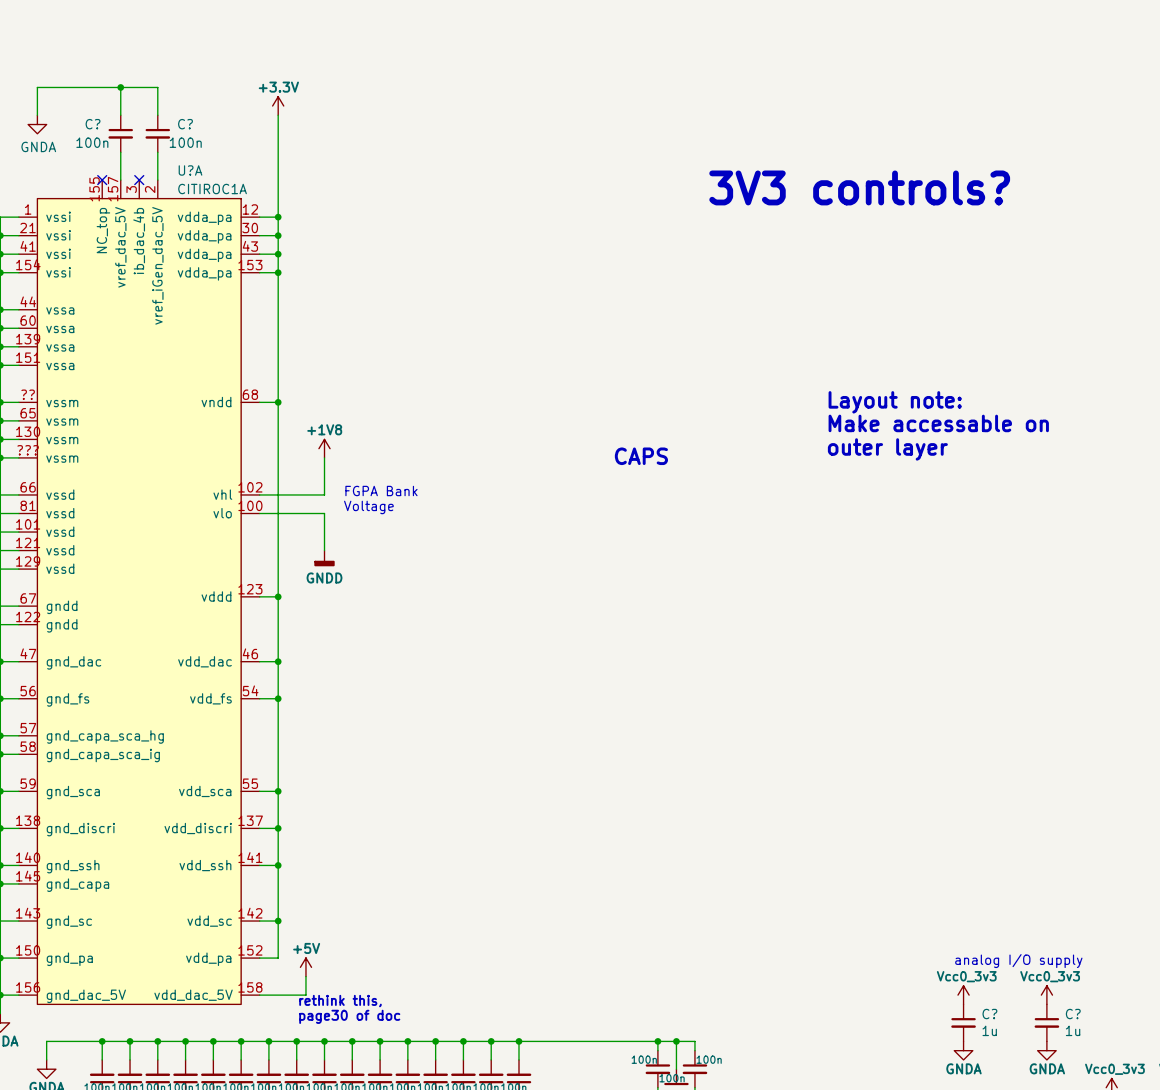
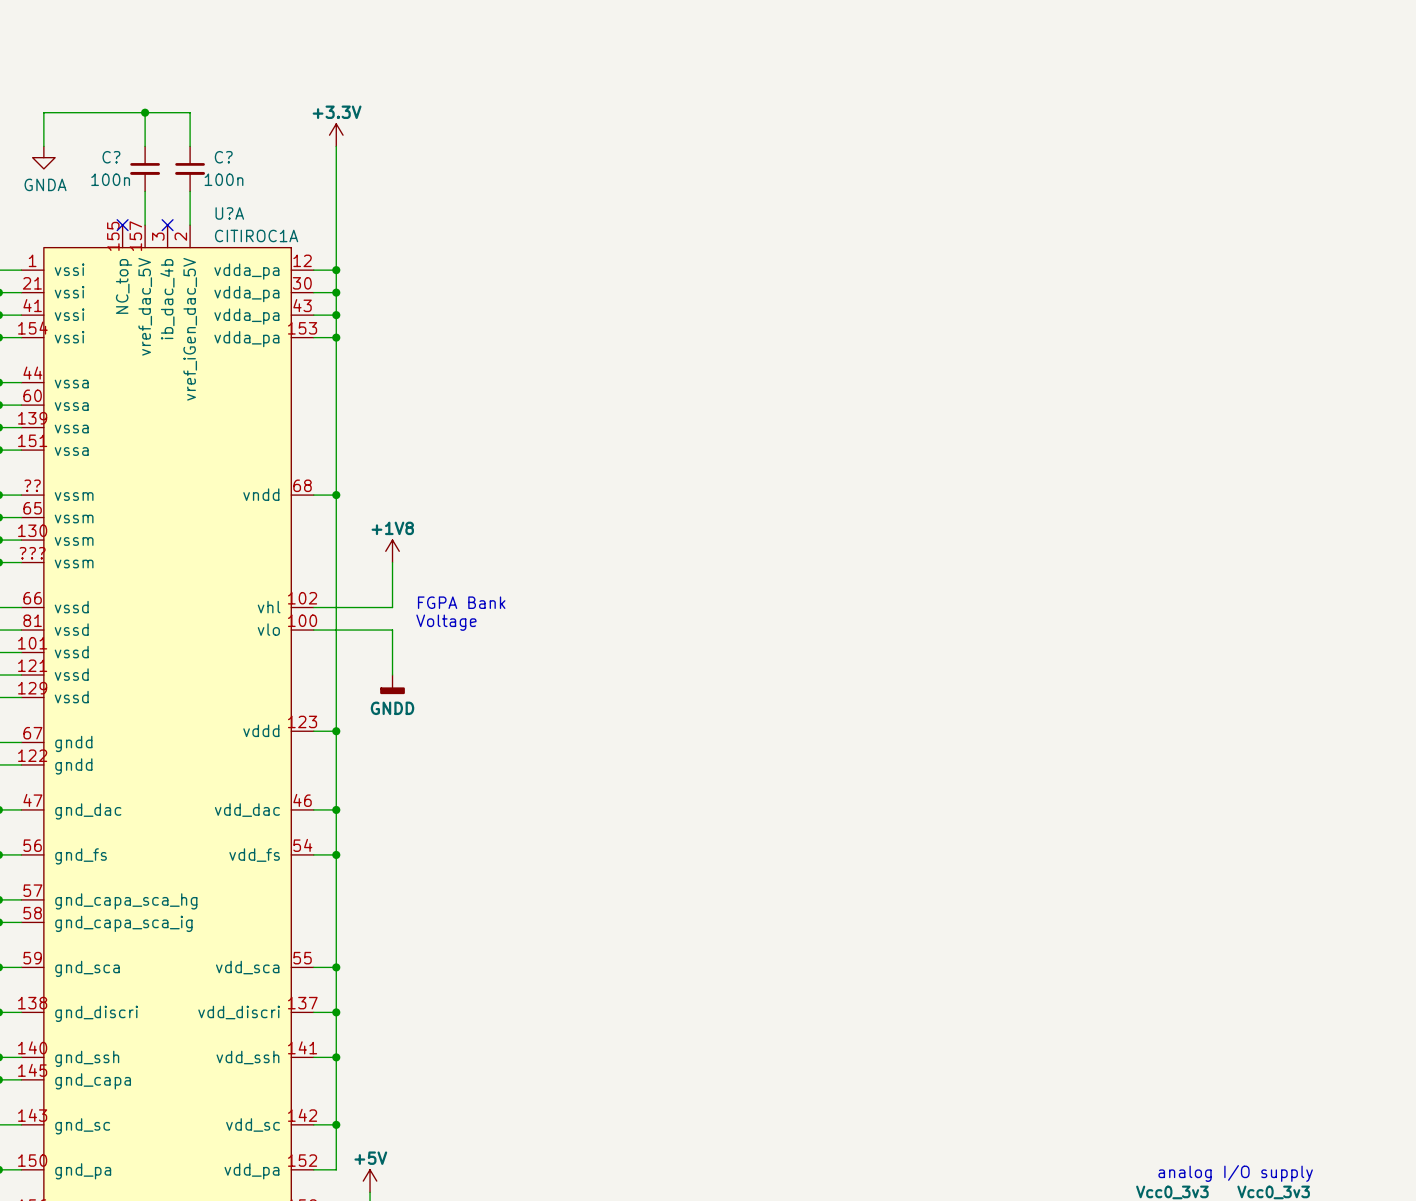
text: 3V3 controls? (859, 187) -> none
text: Layout note: (895, 402) -> none
text: Make accessable on (938, 423) -> none
text: outer layer (887, 449) -> none
text: CAPS (641, 456) -> none

